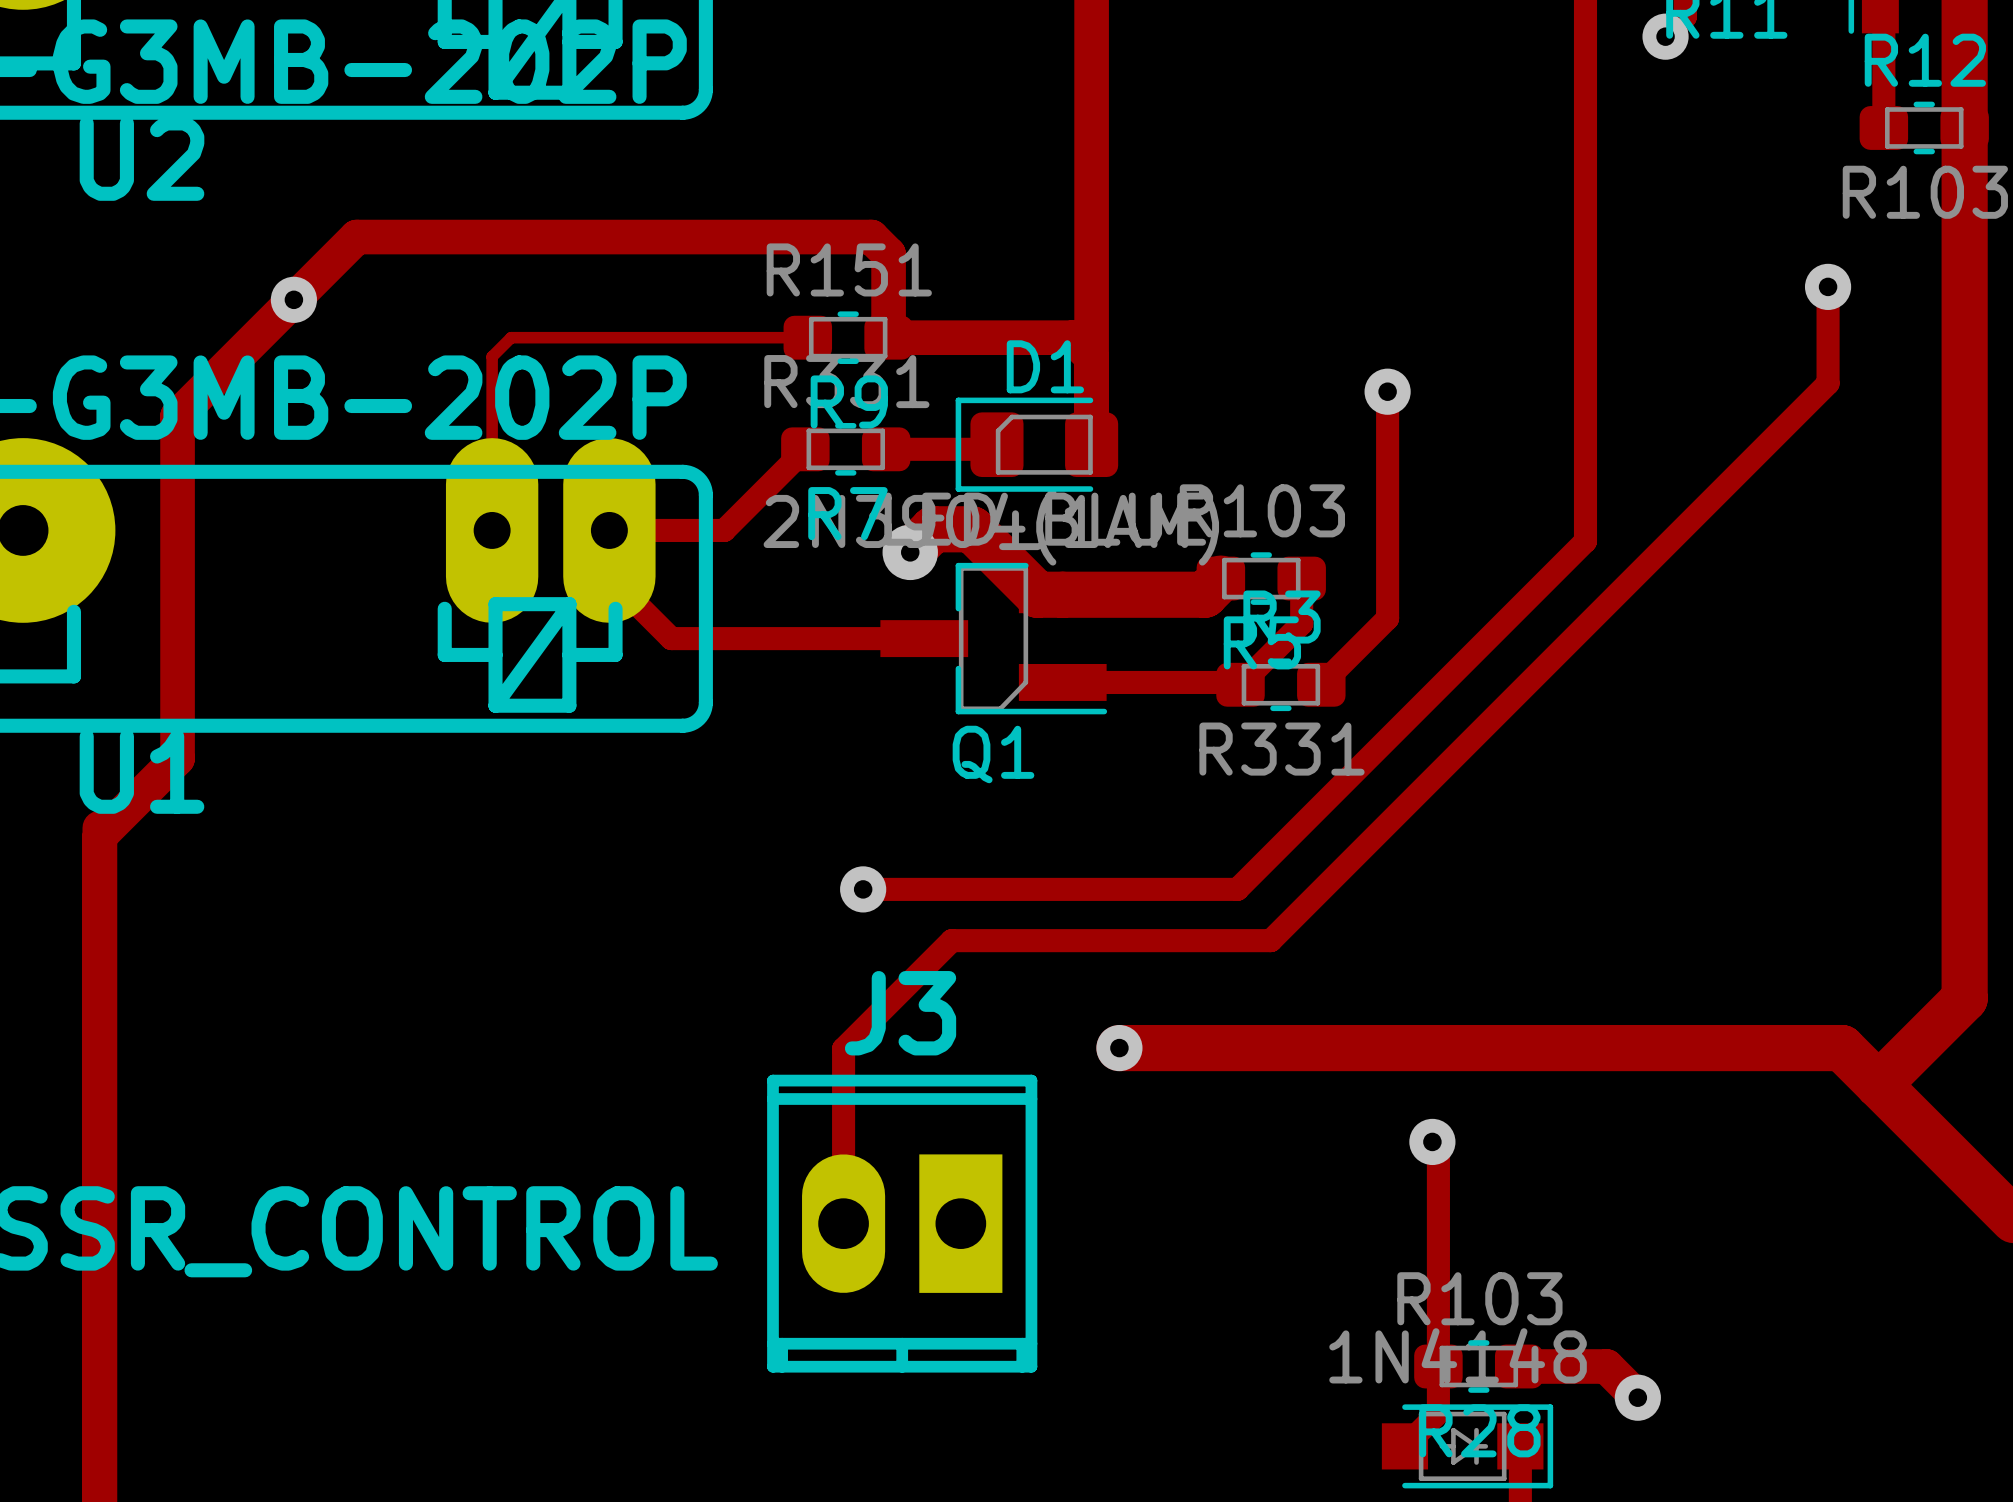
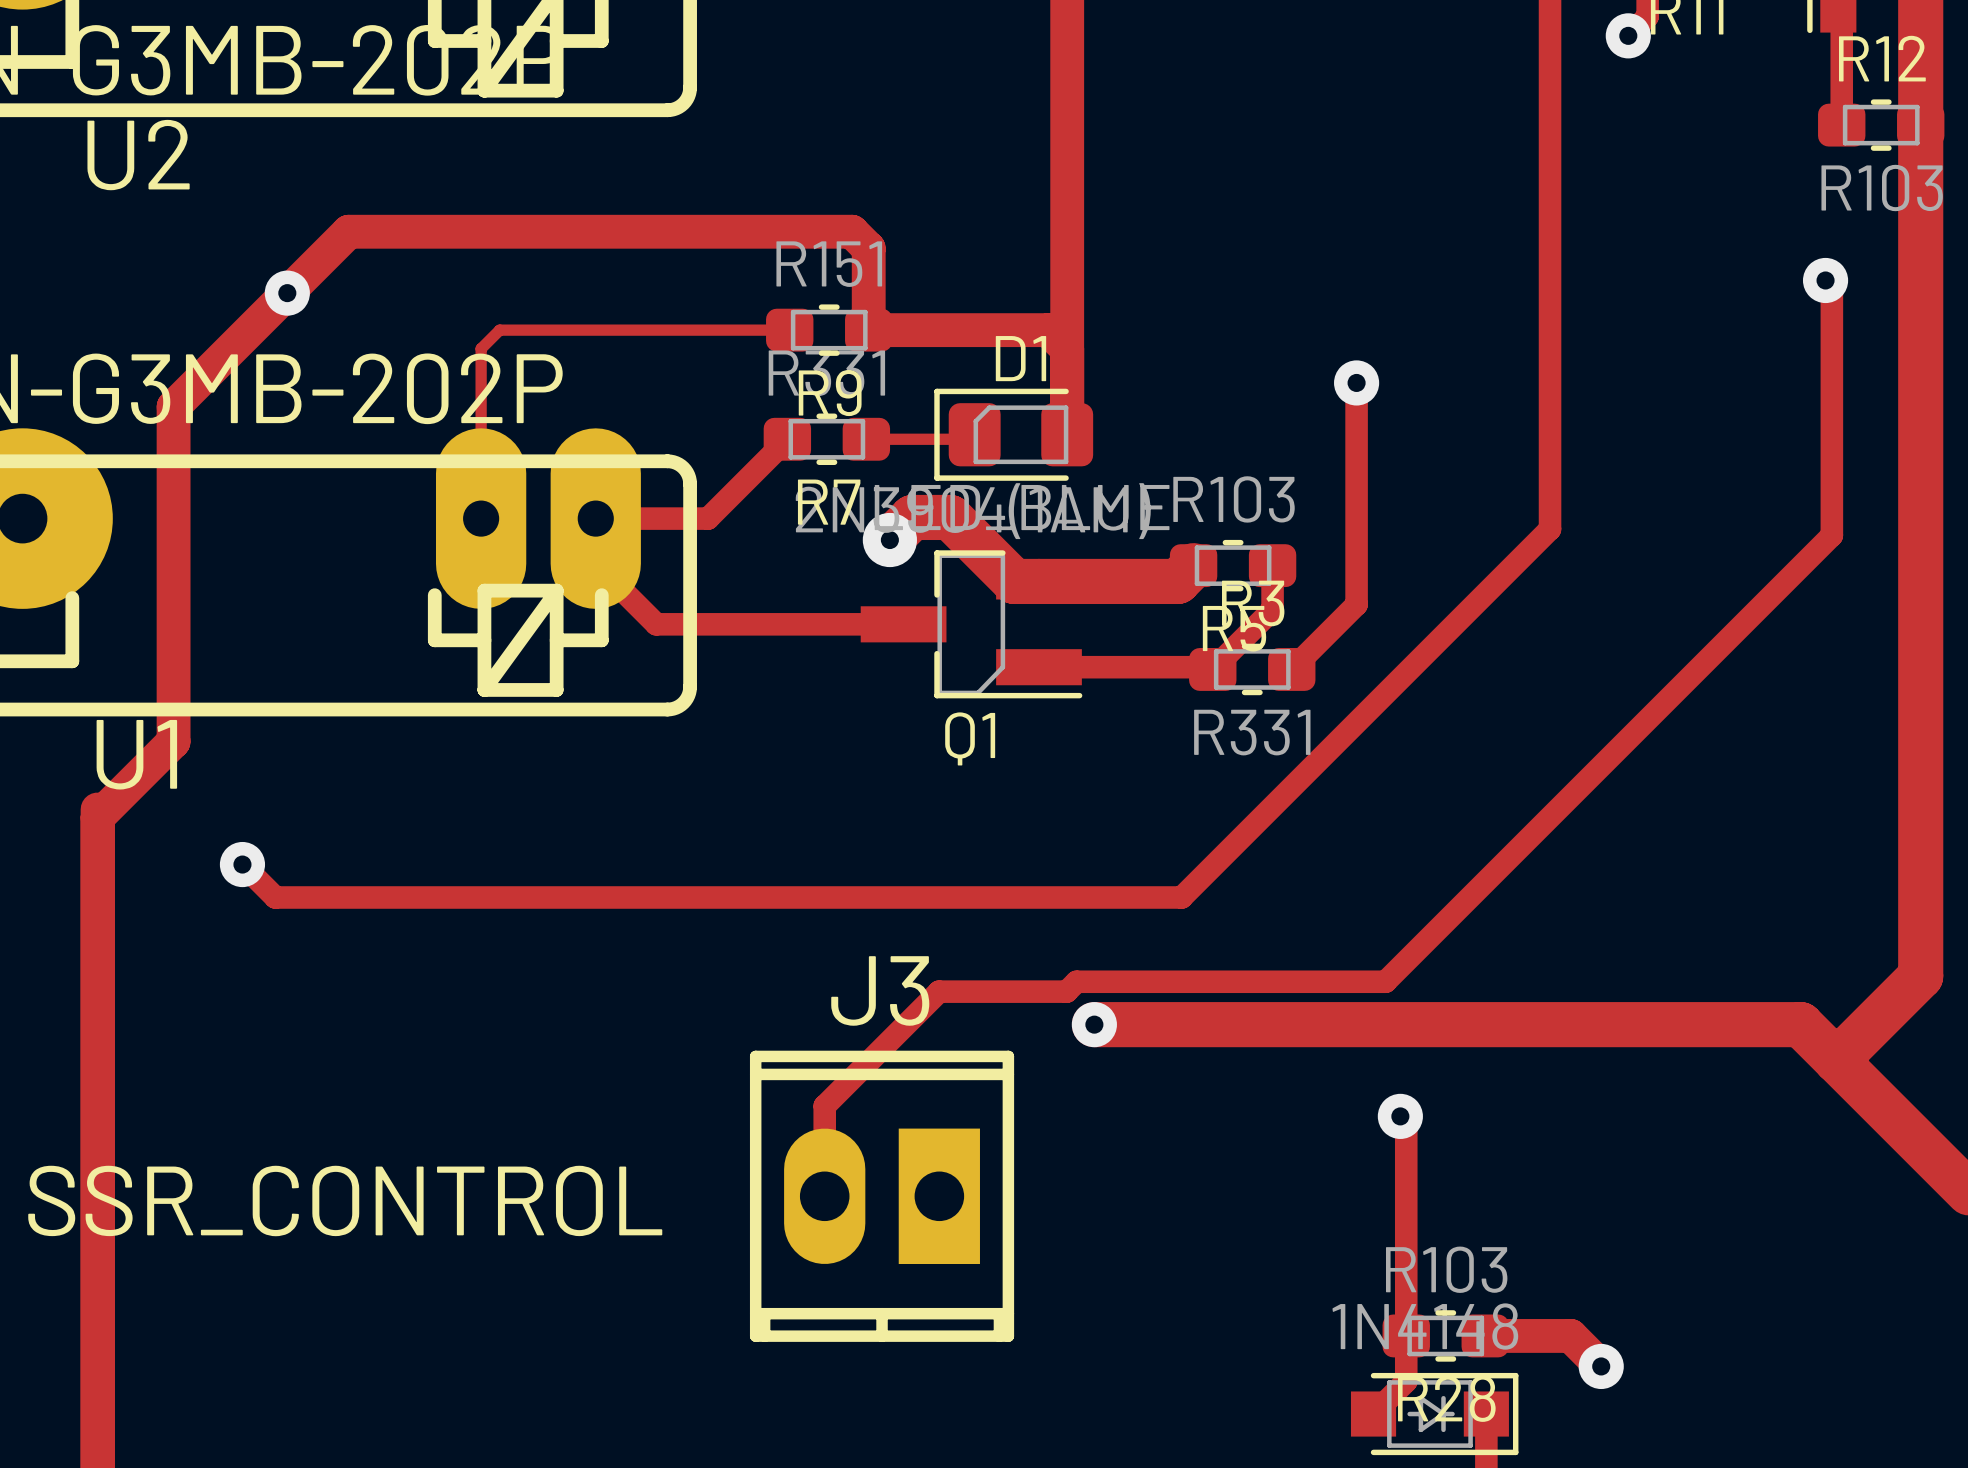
track: (1828, 286) (1828, 383) (1270, 940) (951, 940) (843, 1048) (843, 1131) -> (1825, 280) (1831, 286) (1831, 535) (1385, 981) (1076, 981) (1066, 991) (939, 991) (824, 1106)
via position: (1828, 286) -> (1825, 280)
track width: thick (996, 444) (992, 449) (886, 449) -> thin (974, 434) (970, 439) (866, 439)
via: none -> (242, 864)
track: (863, 889) (1237, 889) -> (242, 864) (275, 897) (1181, 897) (1209, 869)
via: (863, 889) -> none

